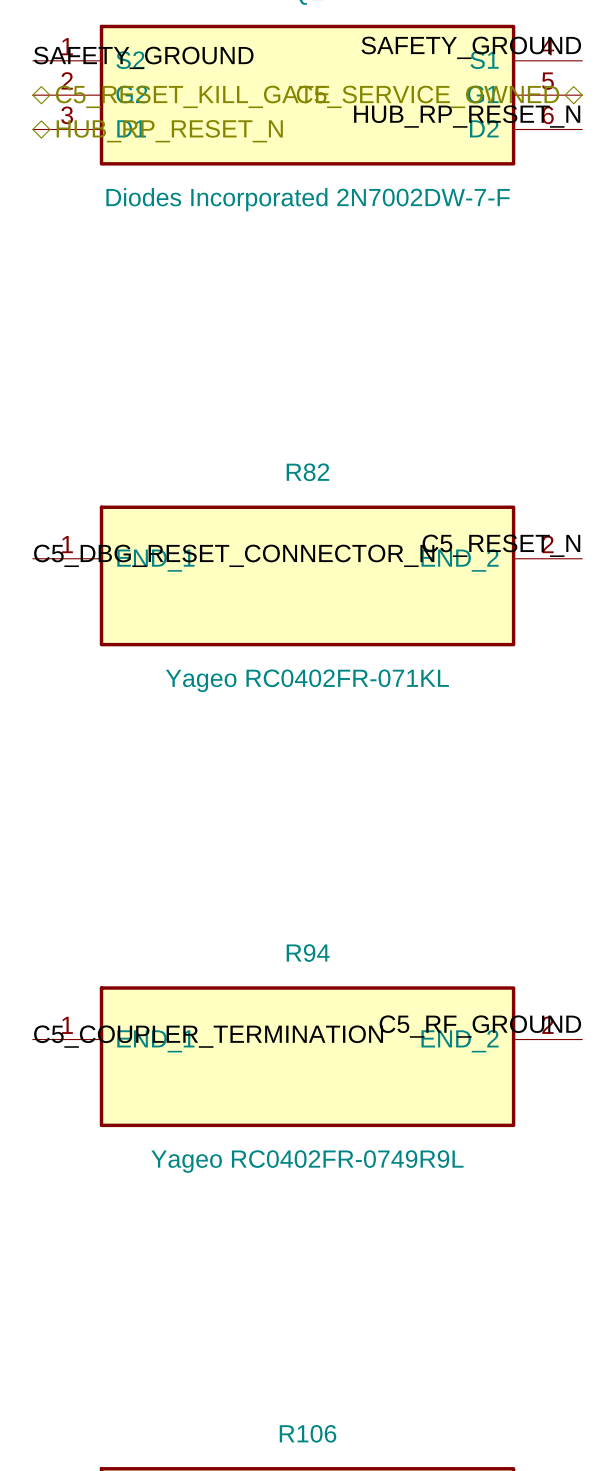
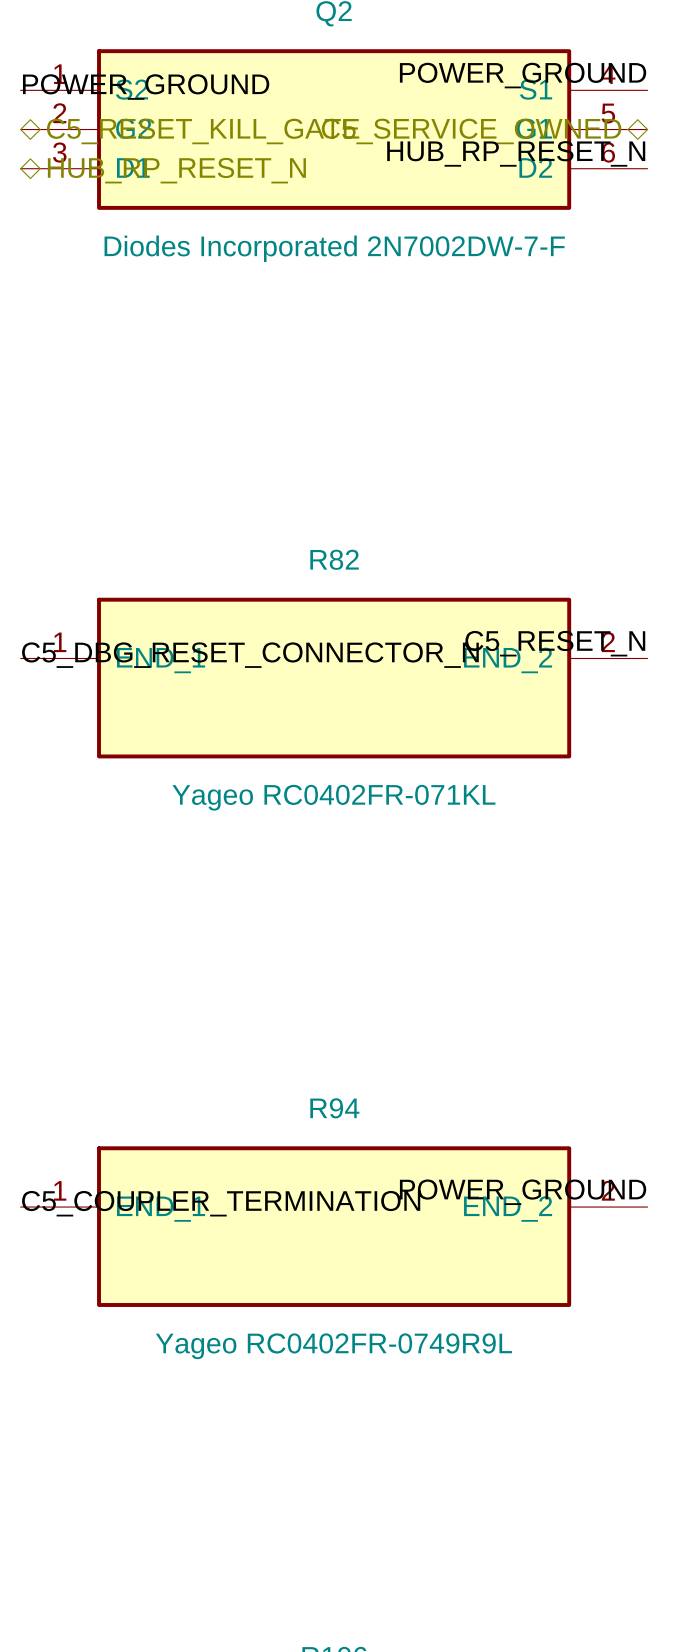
label: SAFETY_GROUND (471, 47) -> POWER_GROUND (523, 75)
label: SAFETY_GROUND (143, 57) -> POWER_GROUND (146, 87)
label: C5_RF_GROUND (480, 1026) -> POWER_GROUND (523, 1192)

